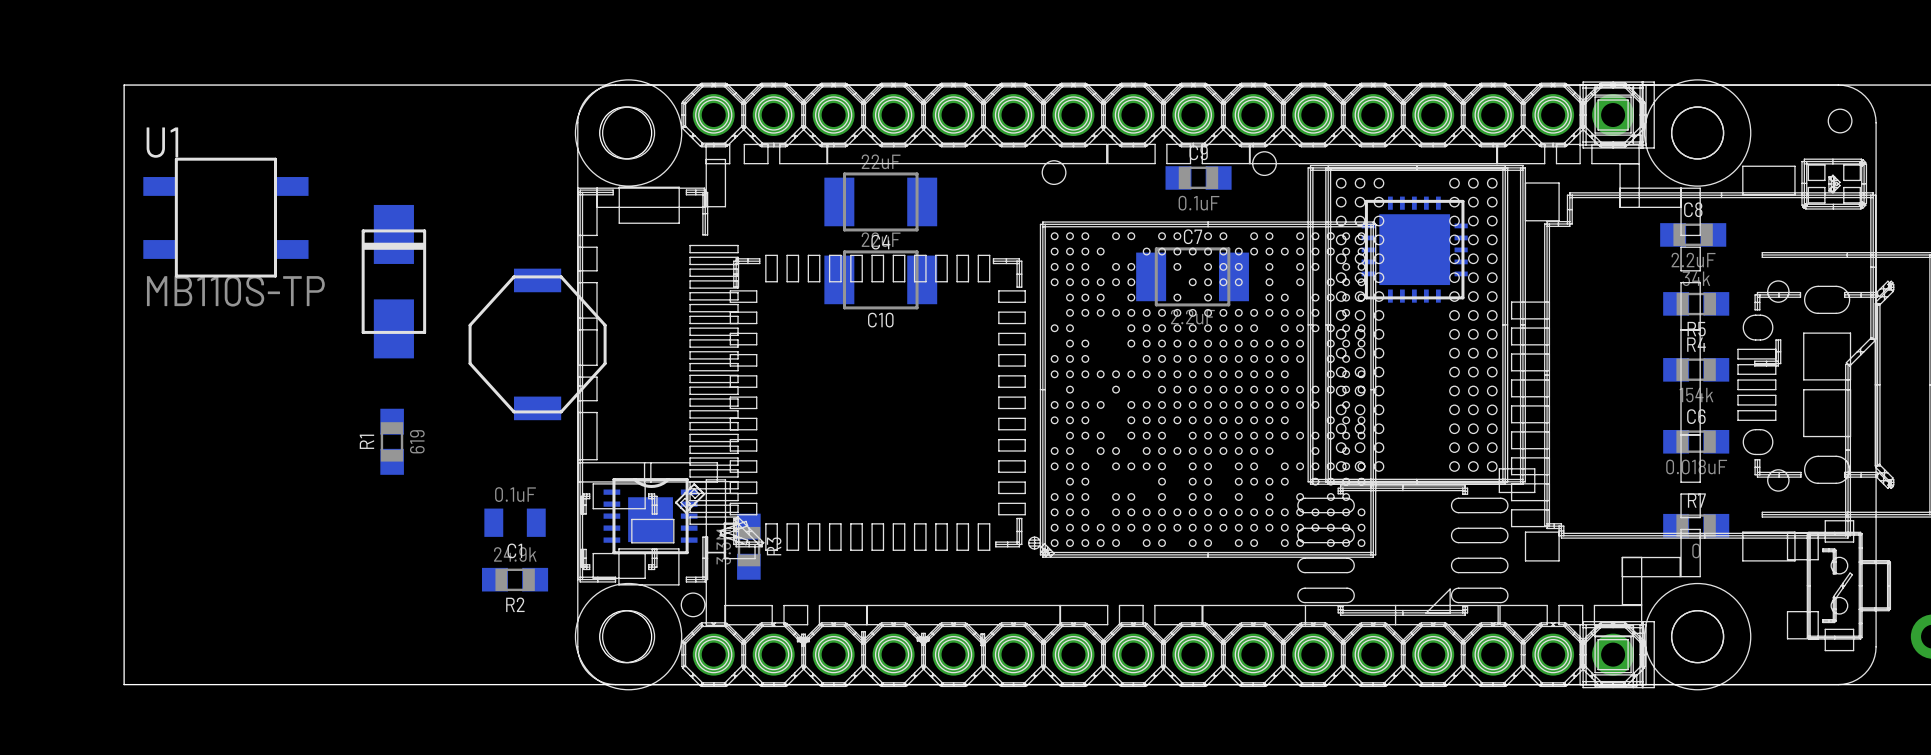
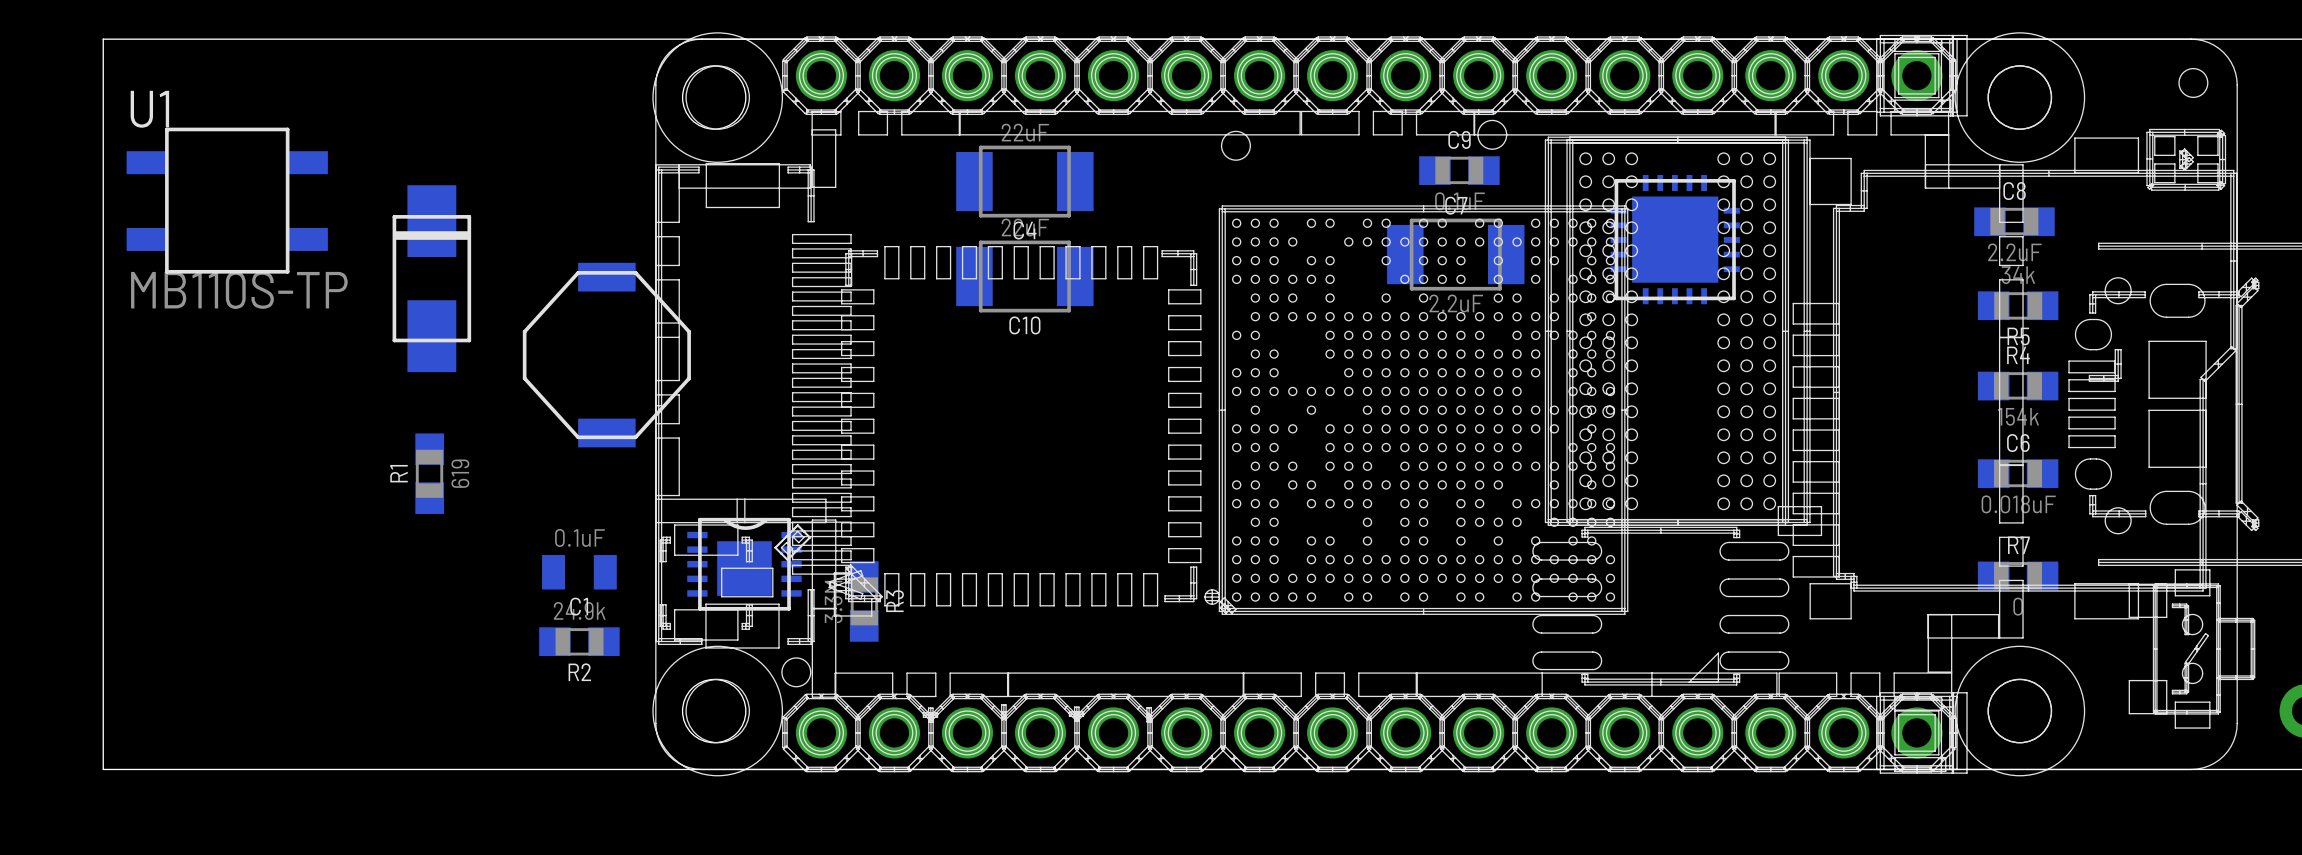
C9 position: (1198, 177) -> (1459, 170)
C7 position: (1192, 276) -> (1455, 254)

